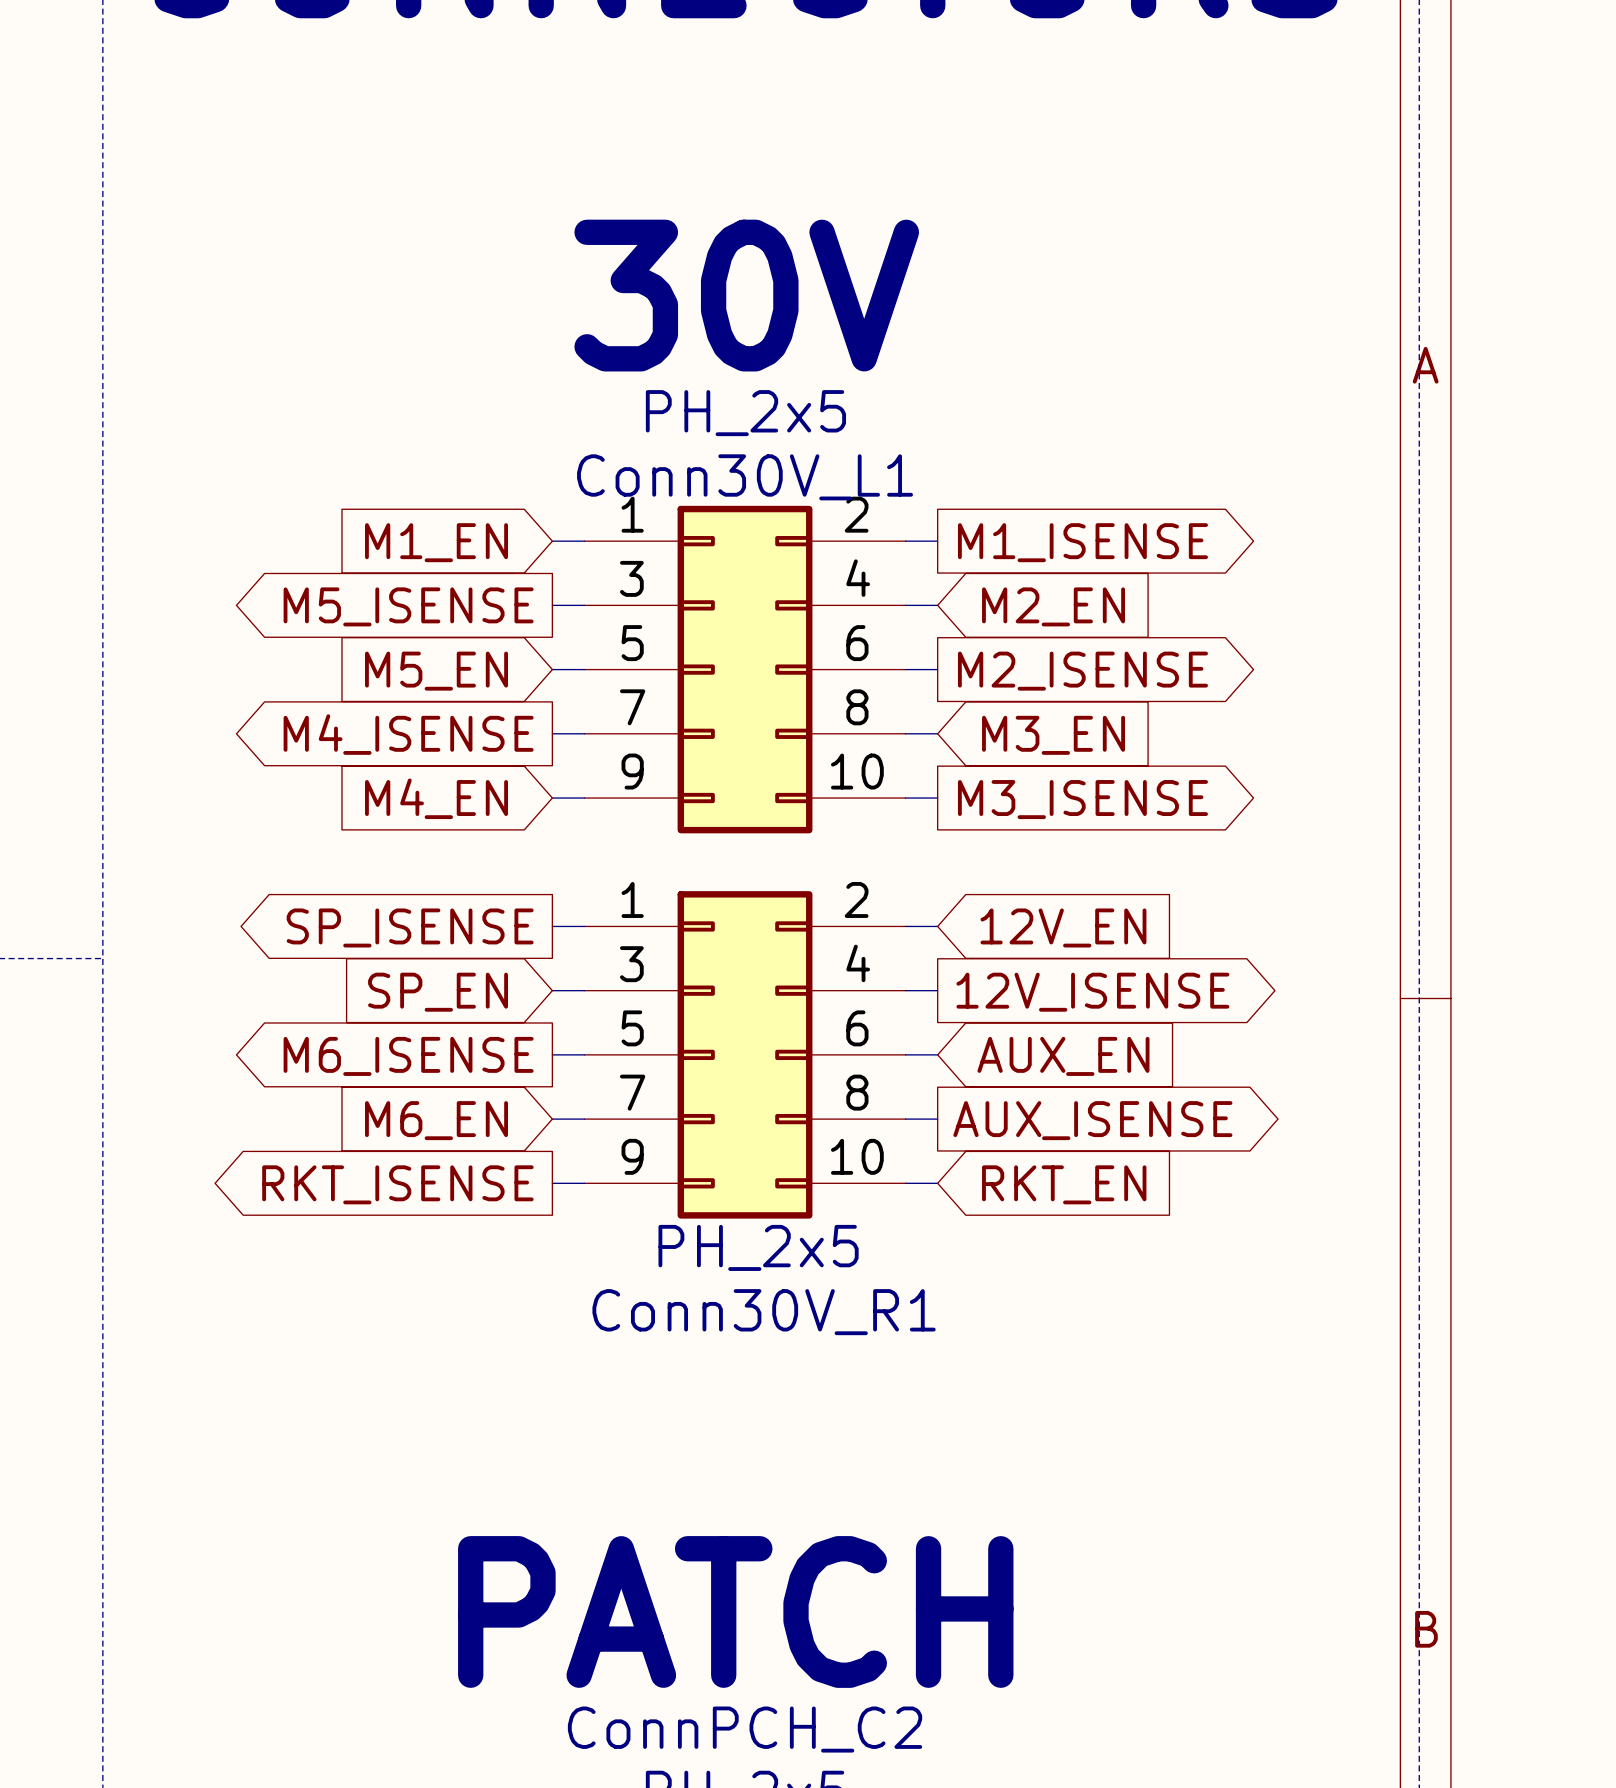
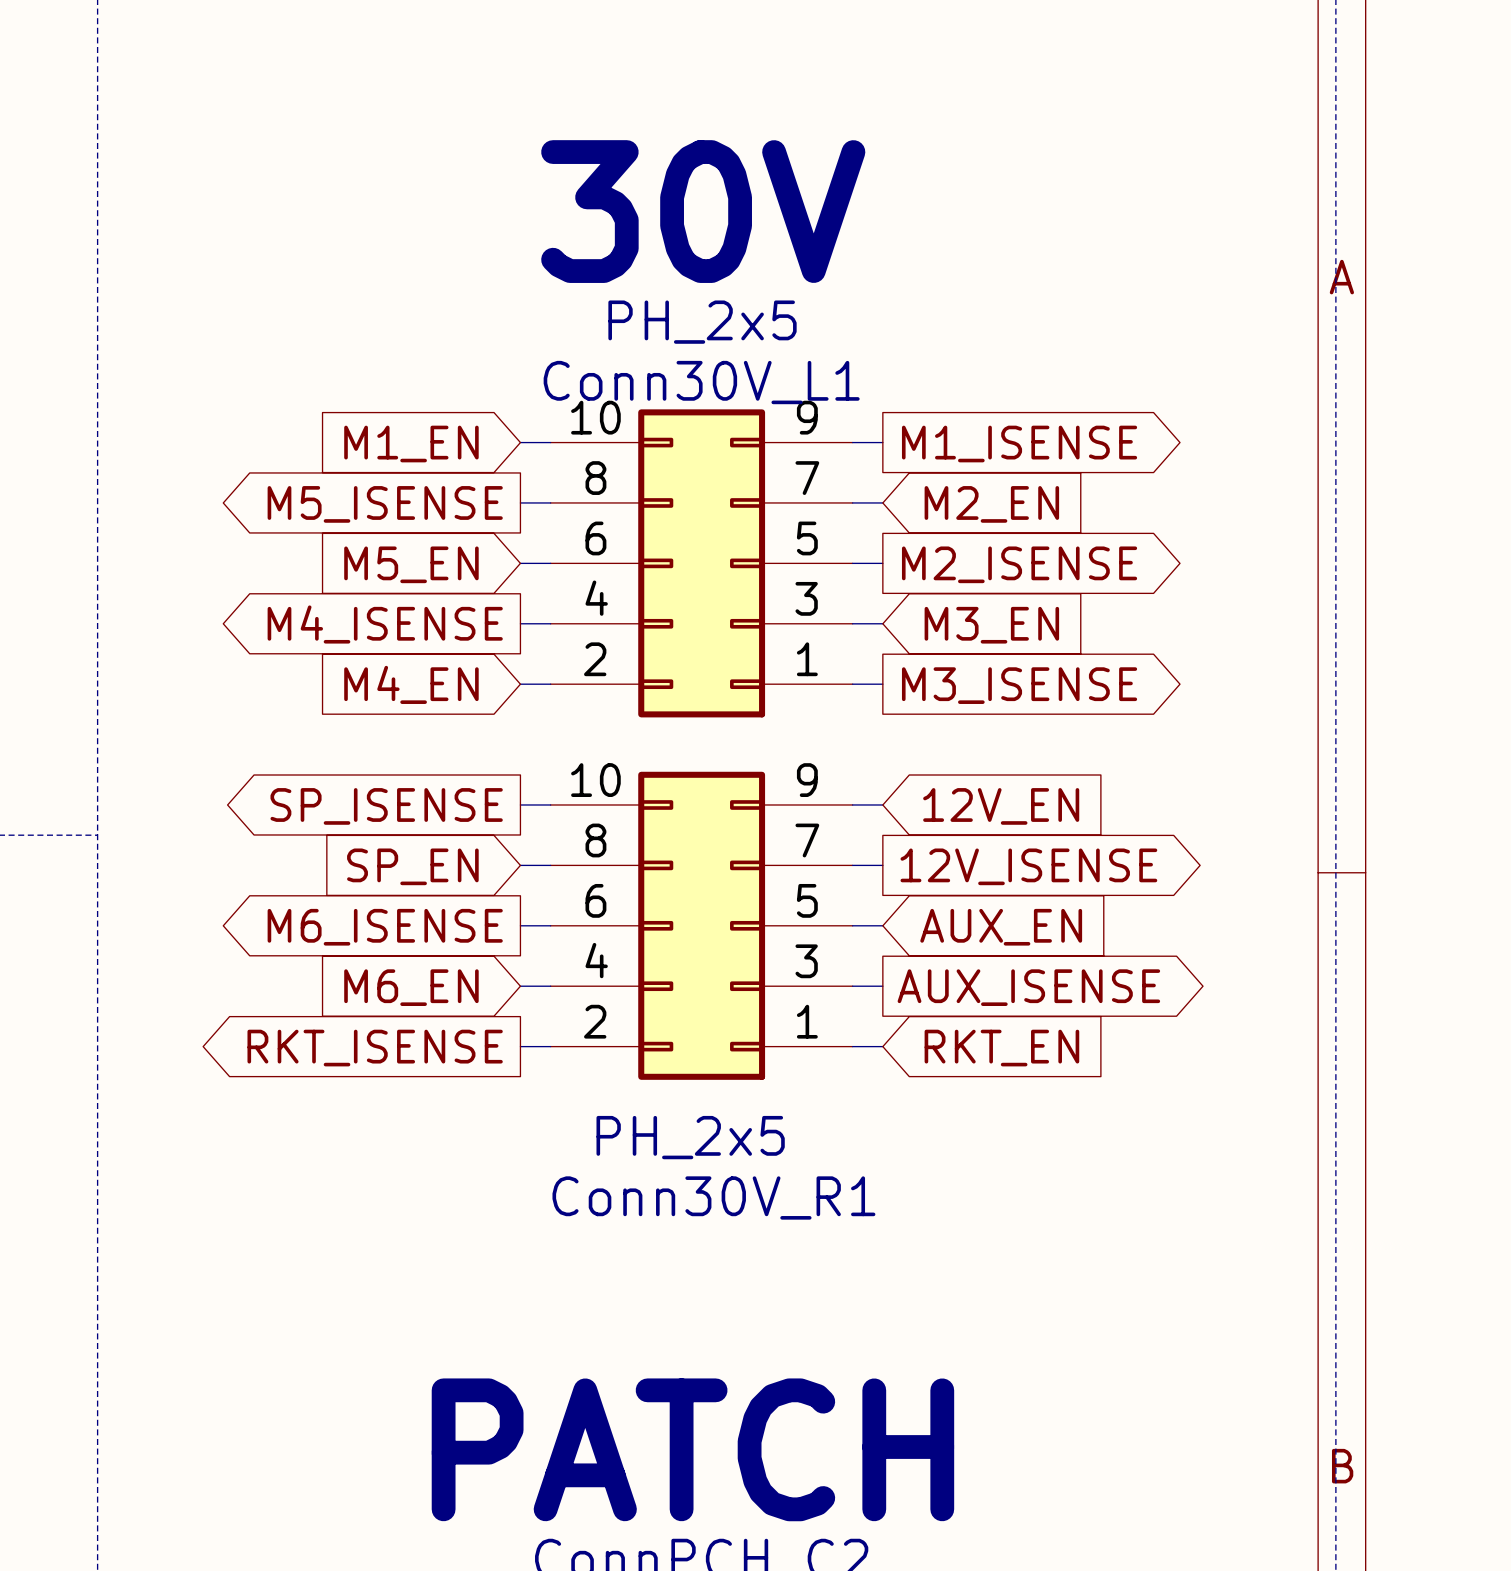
Conn30V_L1 rotation: 0° (745, 669) -> 180° (701, 563)
Conn30V_R1 rotation: 0° (745, 1054) -> 180° (701, 925)
Conn30V_R1 value position: PH_2x5 (758, 1247) -> PH_2x5 (690, 1137)
Conn30V_R1 name position: Conn30V_R1 (764, 1312) -> Conn30V_R1 (713, 1197)

